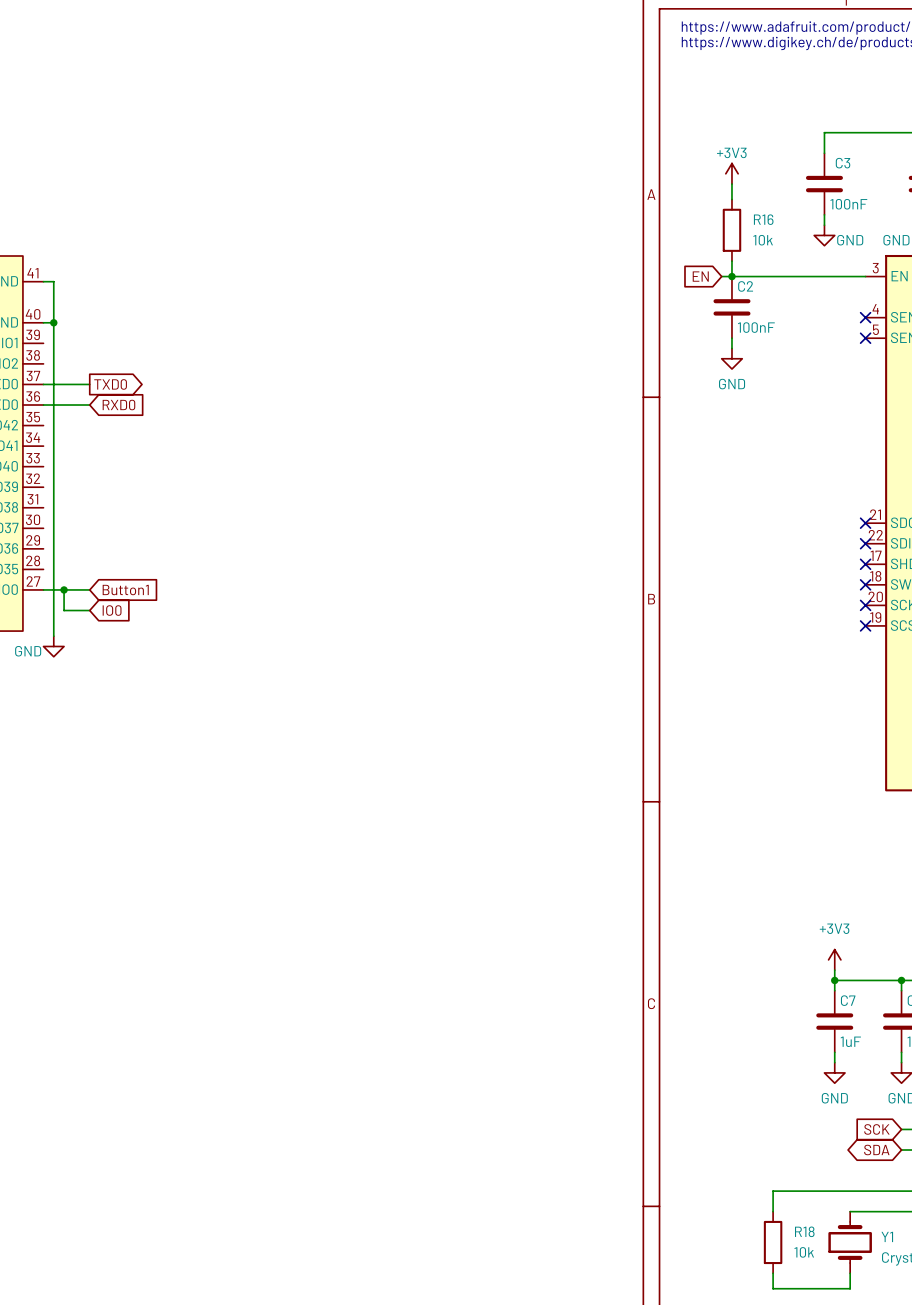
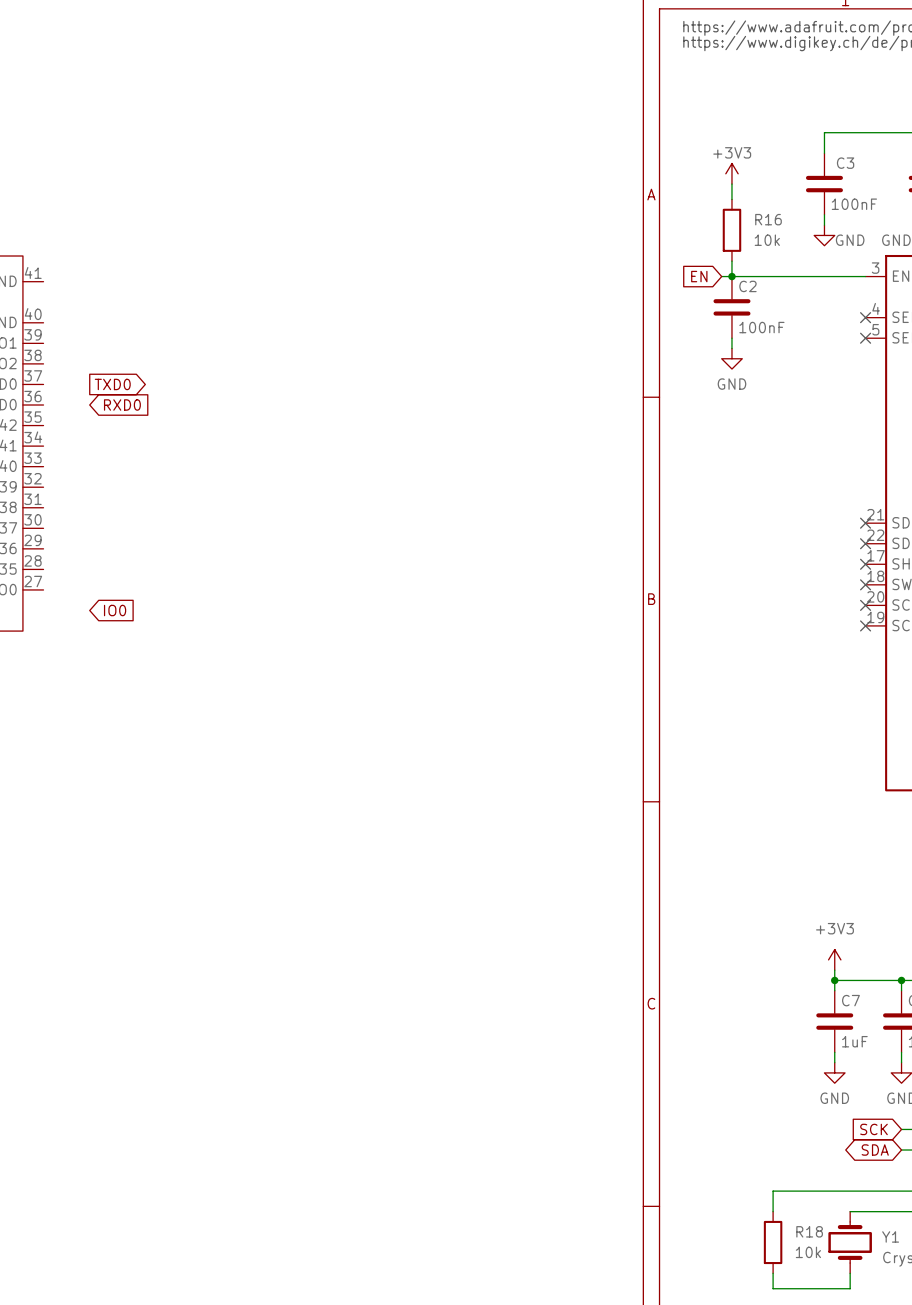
wire: (43, 281) (53, 281) (53, 636) -> none
wire: (43, 322) (53, 322) -> none
junction: (53, 322) -> none
wire: (43, 384) (89, 384) -> none
wire: (43, 405) (89, 405) -> none
wire: (43, 589) (89, 589) -> none
wire: (64, 589) (64, 610) (89, 610) -> none
junction: (64, 589) -> none
global label: Button1 (125, 590) -> none
power symbol: GND (53, 646) -> none

